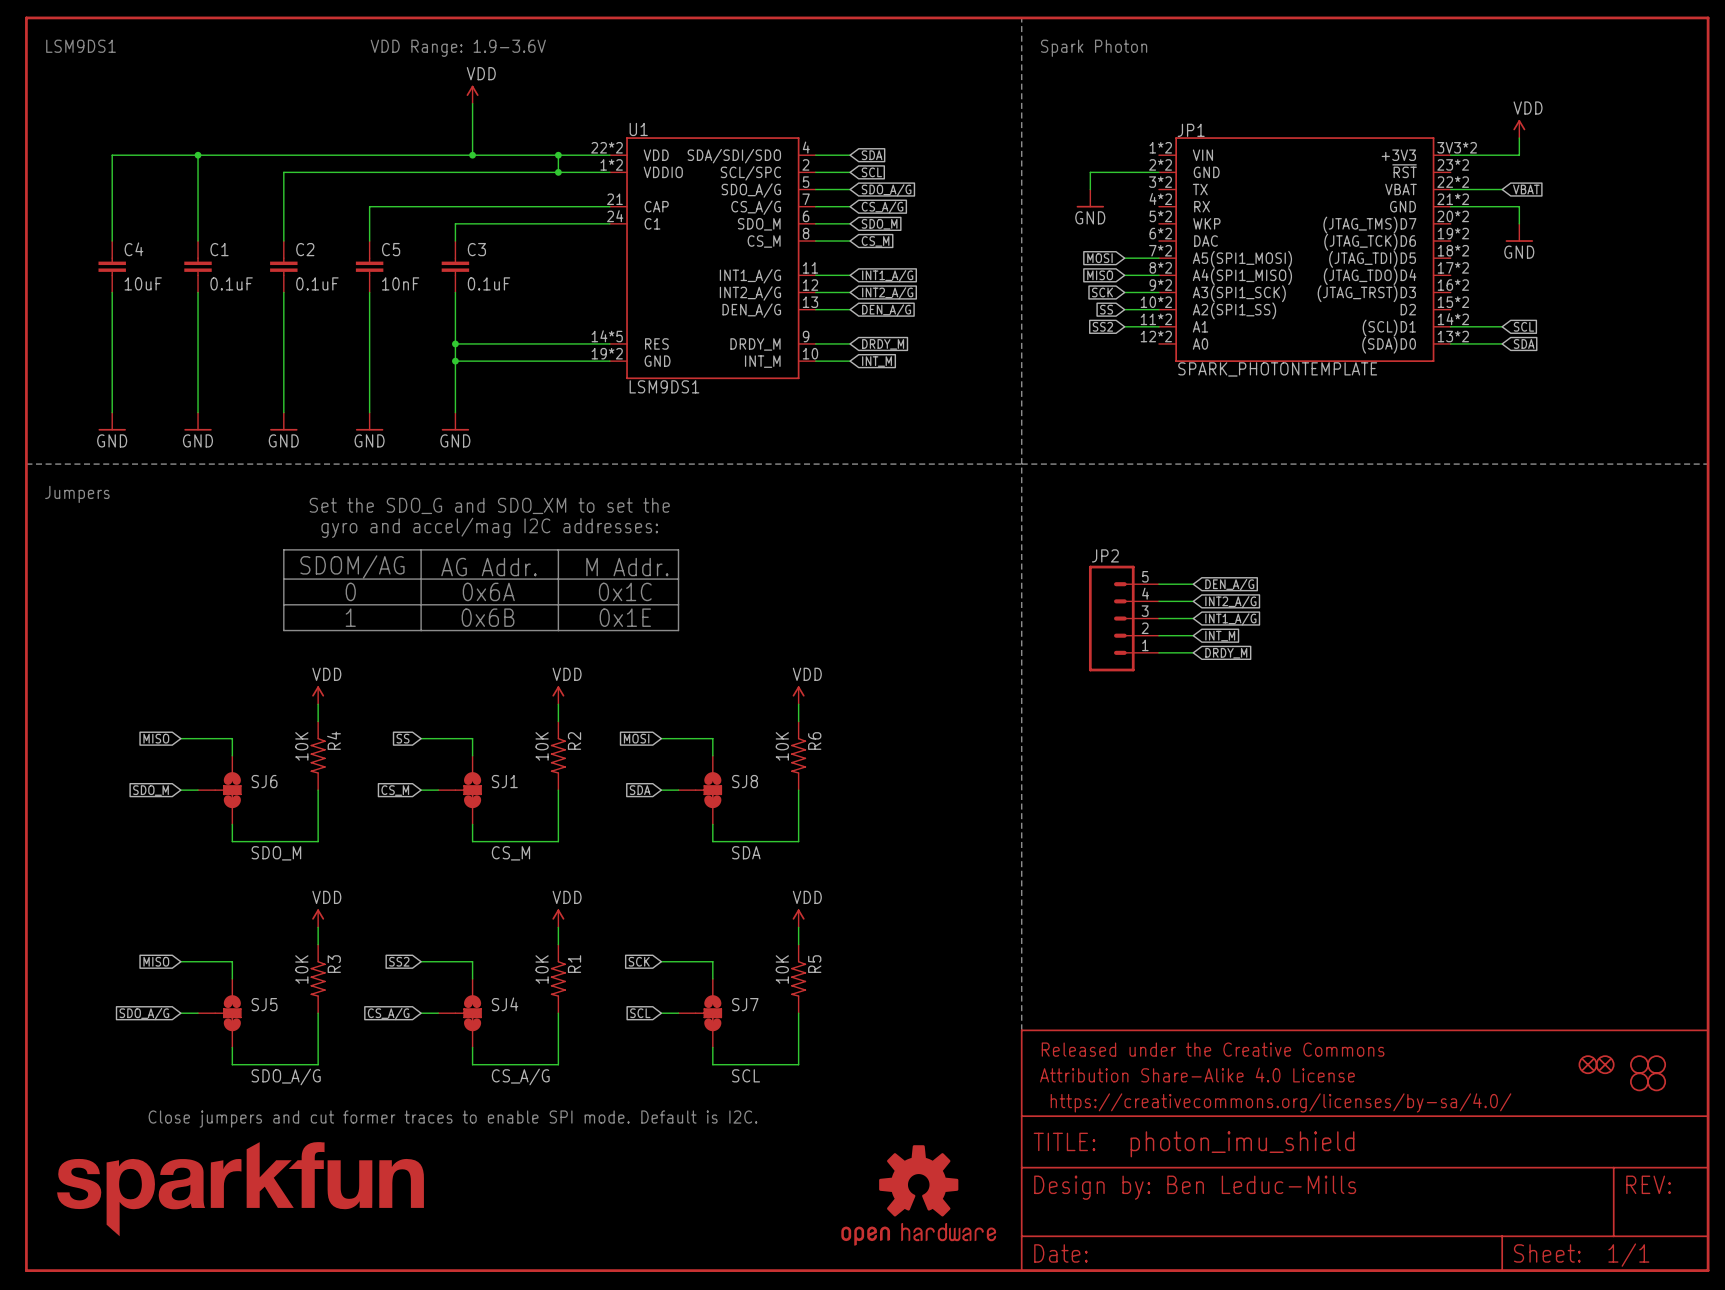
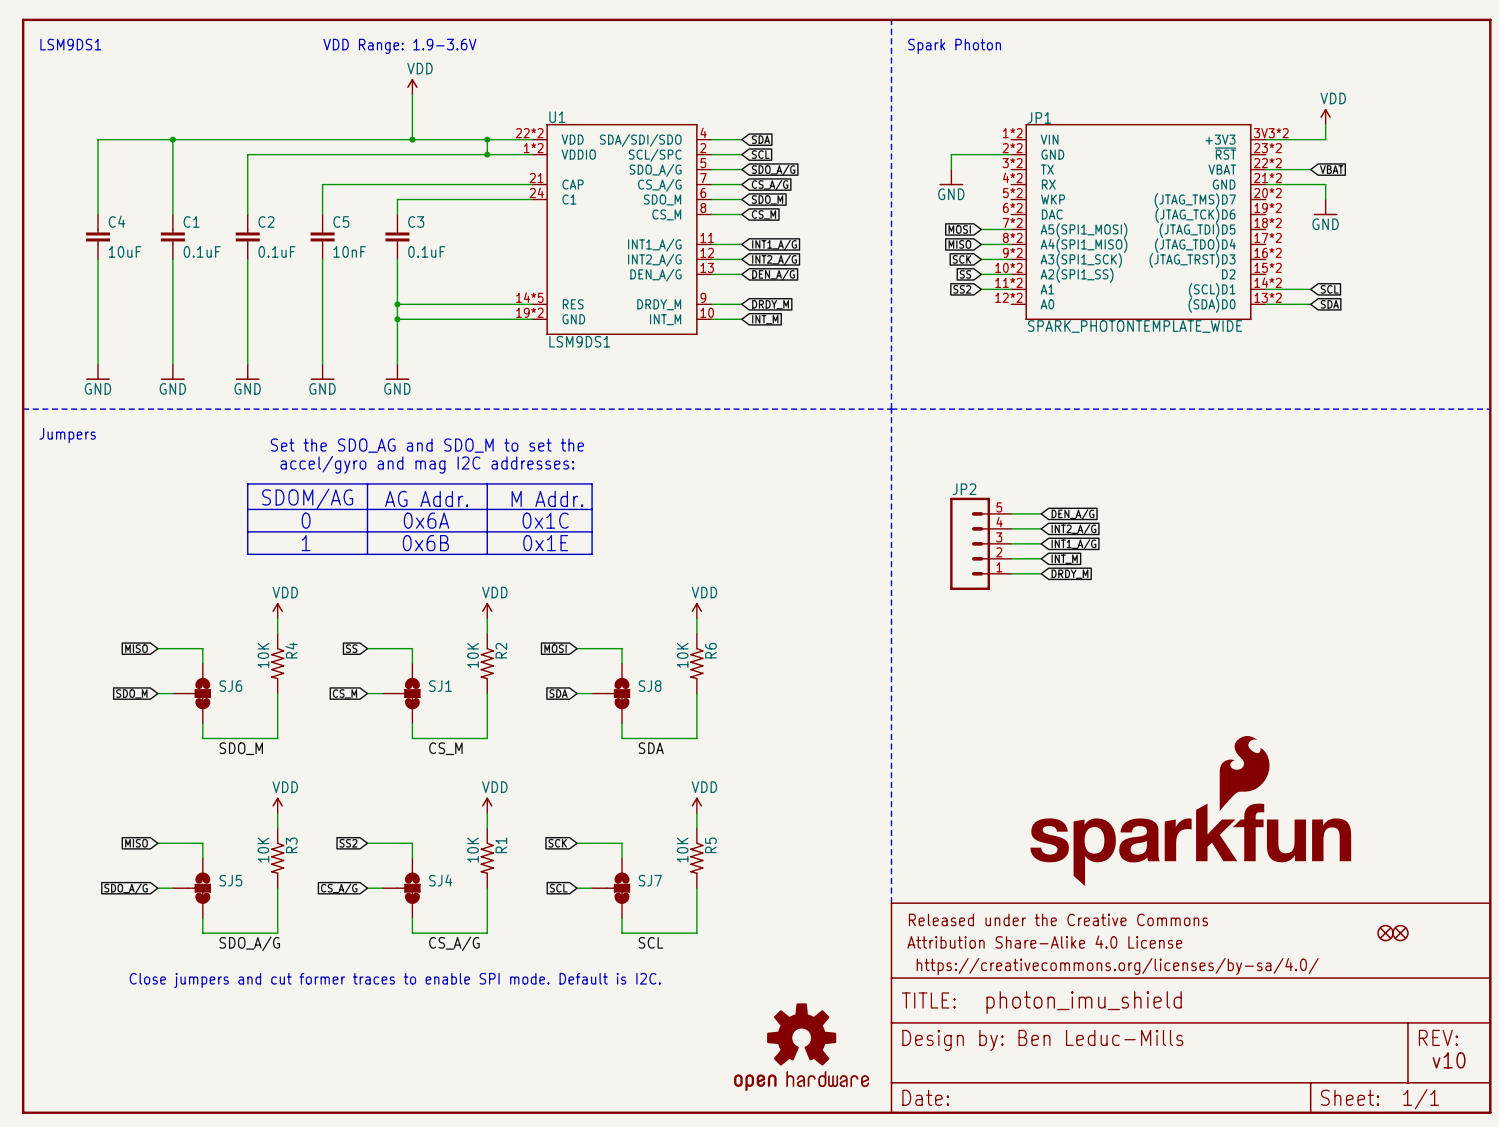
JP1 value: SPARK_PHOTONTEMPLATE (1277, 369) -> SPARK_PHOTONTEMPLATE_WIDE (1135, 326)
text: Set the SDO_G and SDO_XM to set the (489, 505) -> Set the SDO_AG and SDO_M to set the (427, 445)
text: gyro and accel/mag I2C addresses: (489, 527) -> accel/gyro and mag I2C addresses: (427, 464)
part: none -> (1190, 811)
part: (1639, 1064) -> none
part: (1656, 1064) -> none
part: (1639, 1081) -> none
part: (1656, 1081) -> none
part: (240, 1189) -> none
text: none -> v10 (1449, 1060)

